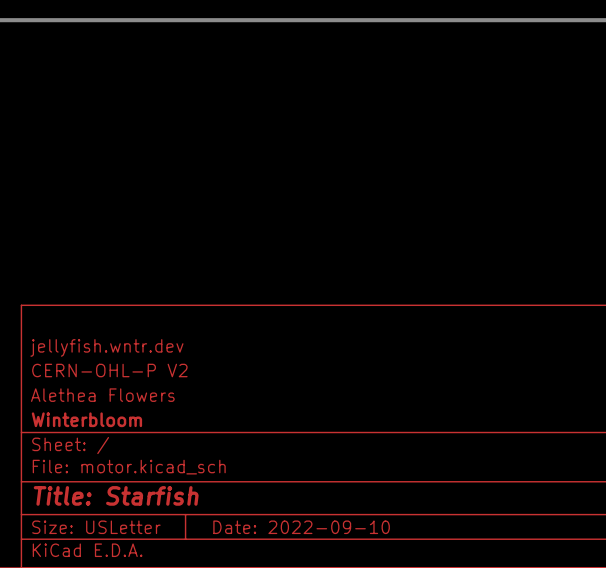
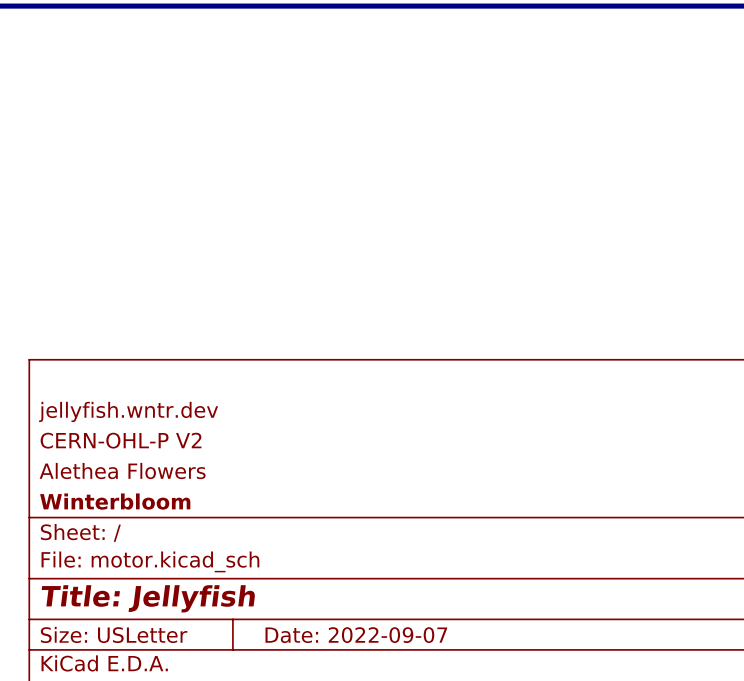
title block: Title: Starfish (116, 495) -> Title: Jellyfish (148, 598)
title block: Date: 2022-09-10 (301, 527) -> Date: 2022-09-07 (356, 635)

